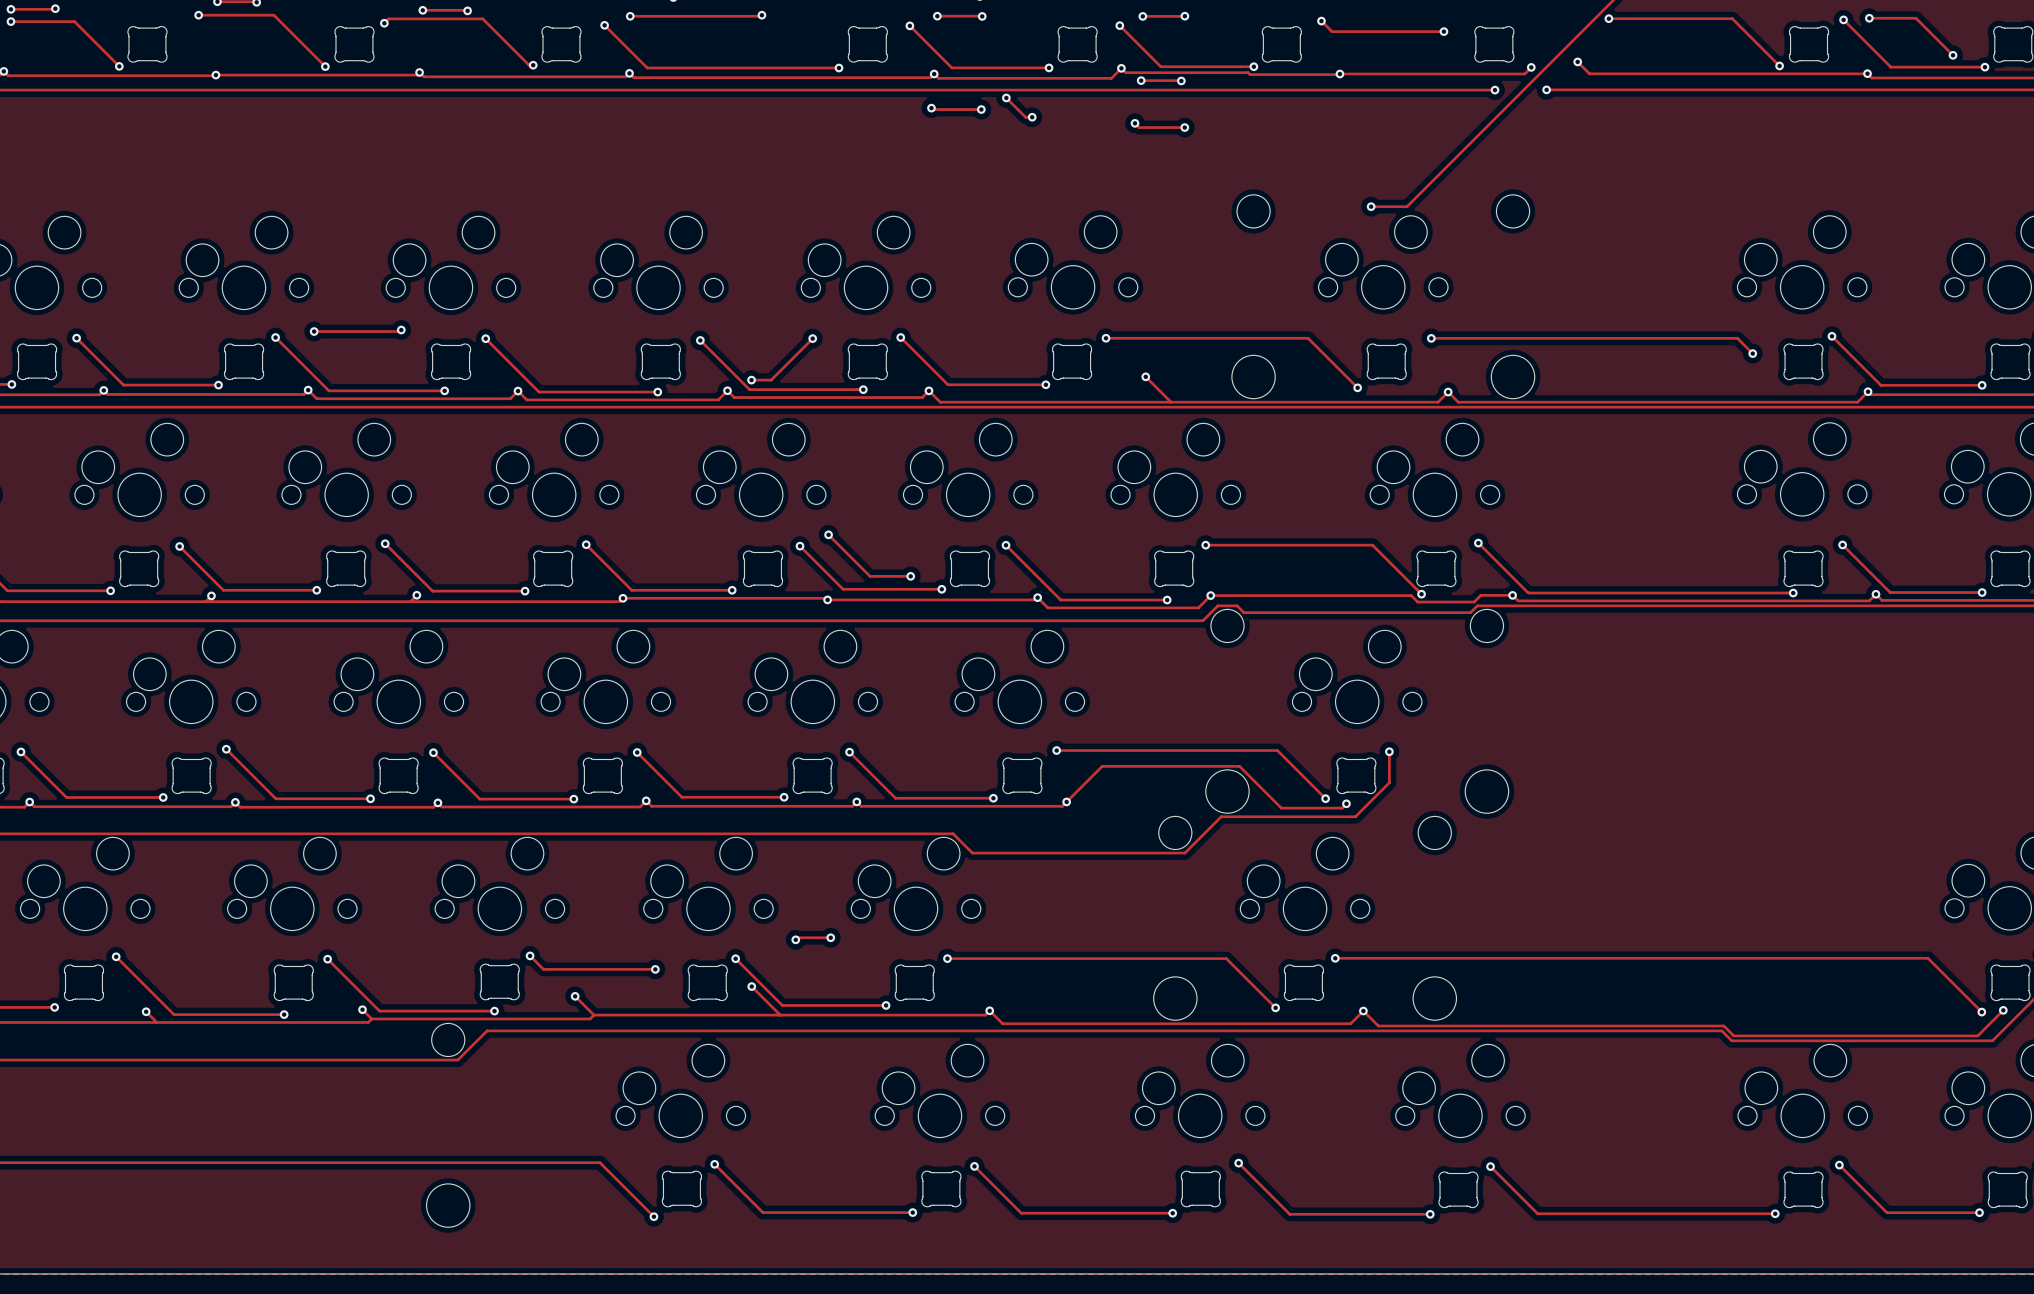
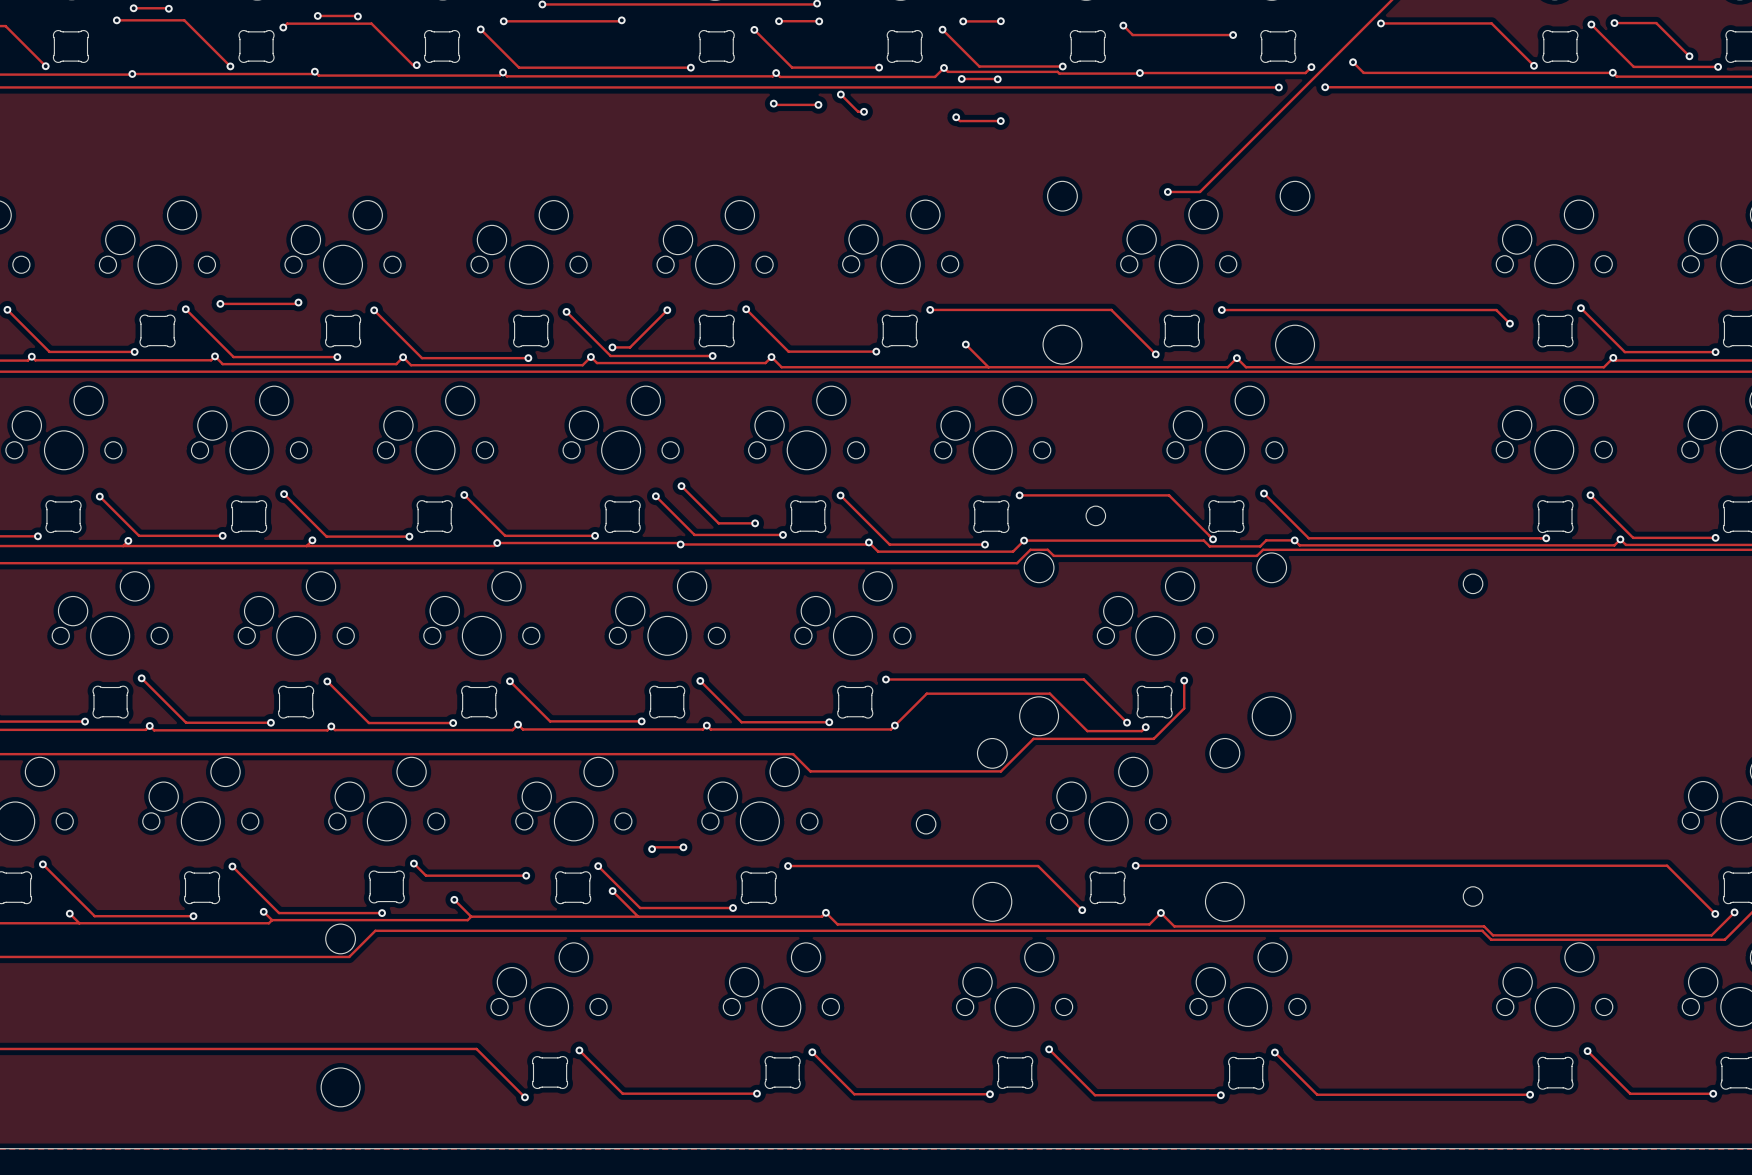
round board edge: none -> [1085, 505, 1106, 526]
round board edge: none -> [1463, 573, 1484, 594]
round board edge: none -> [916, 814, 937, 835]
round board edge: none -> [1463, 886, 1484, 907]

